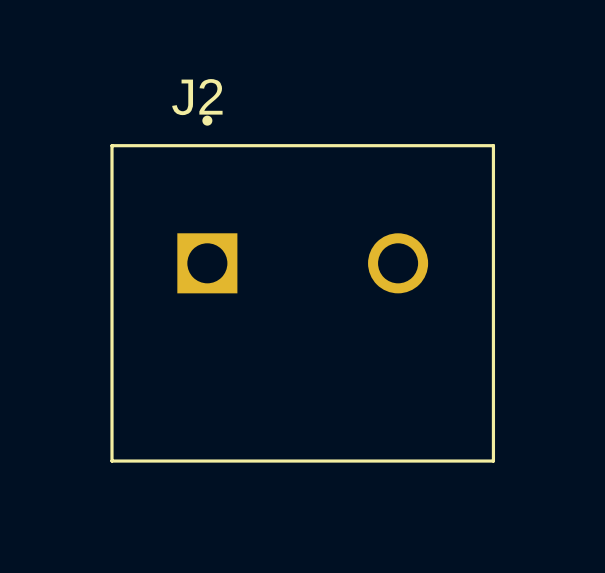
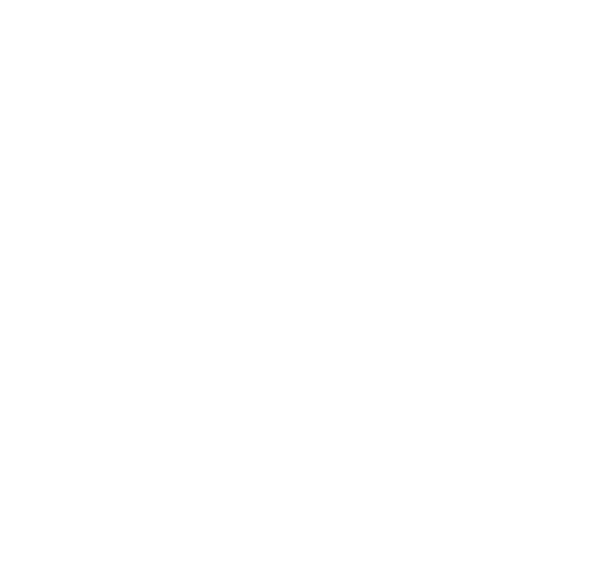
J2: (302, 289) -> none

